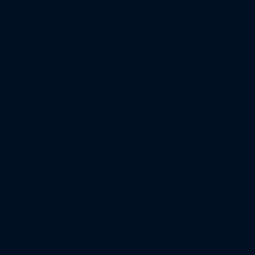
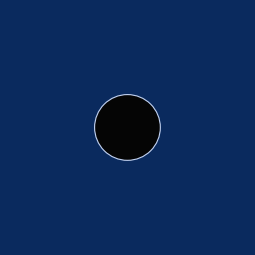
part: none -> (127, 127)

